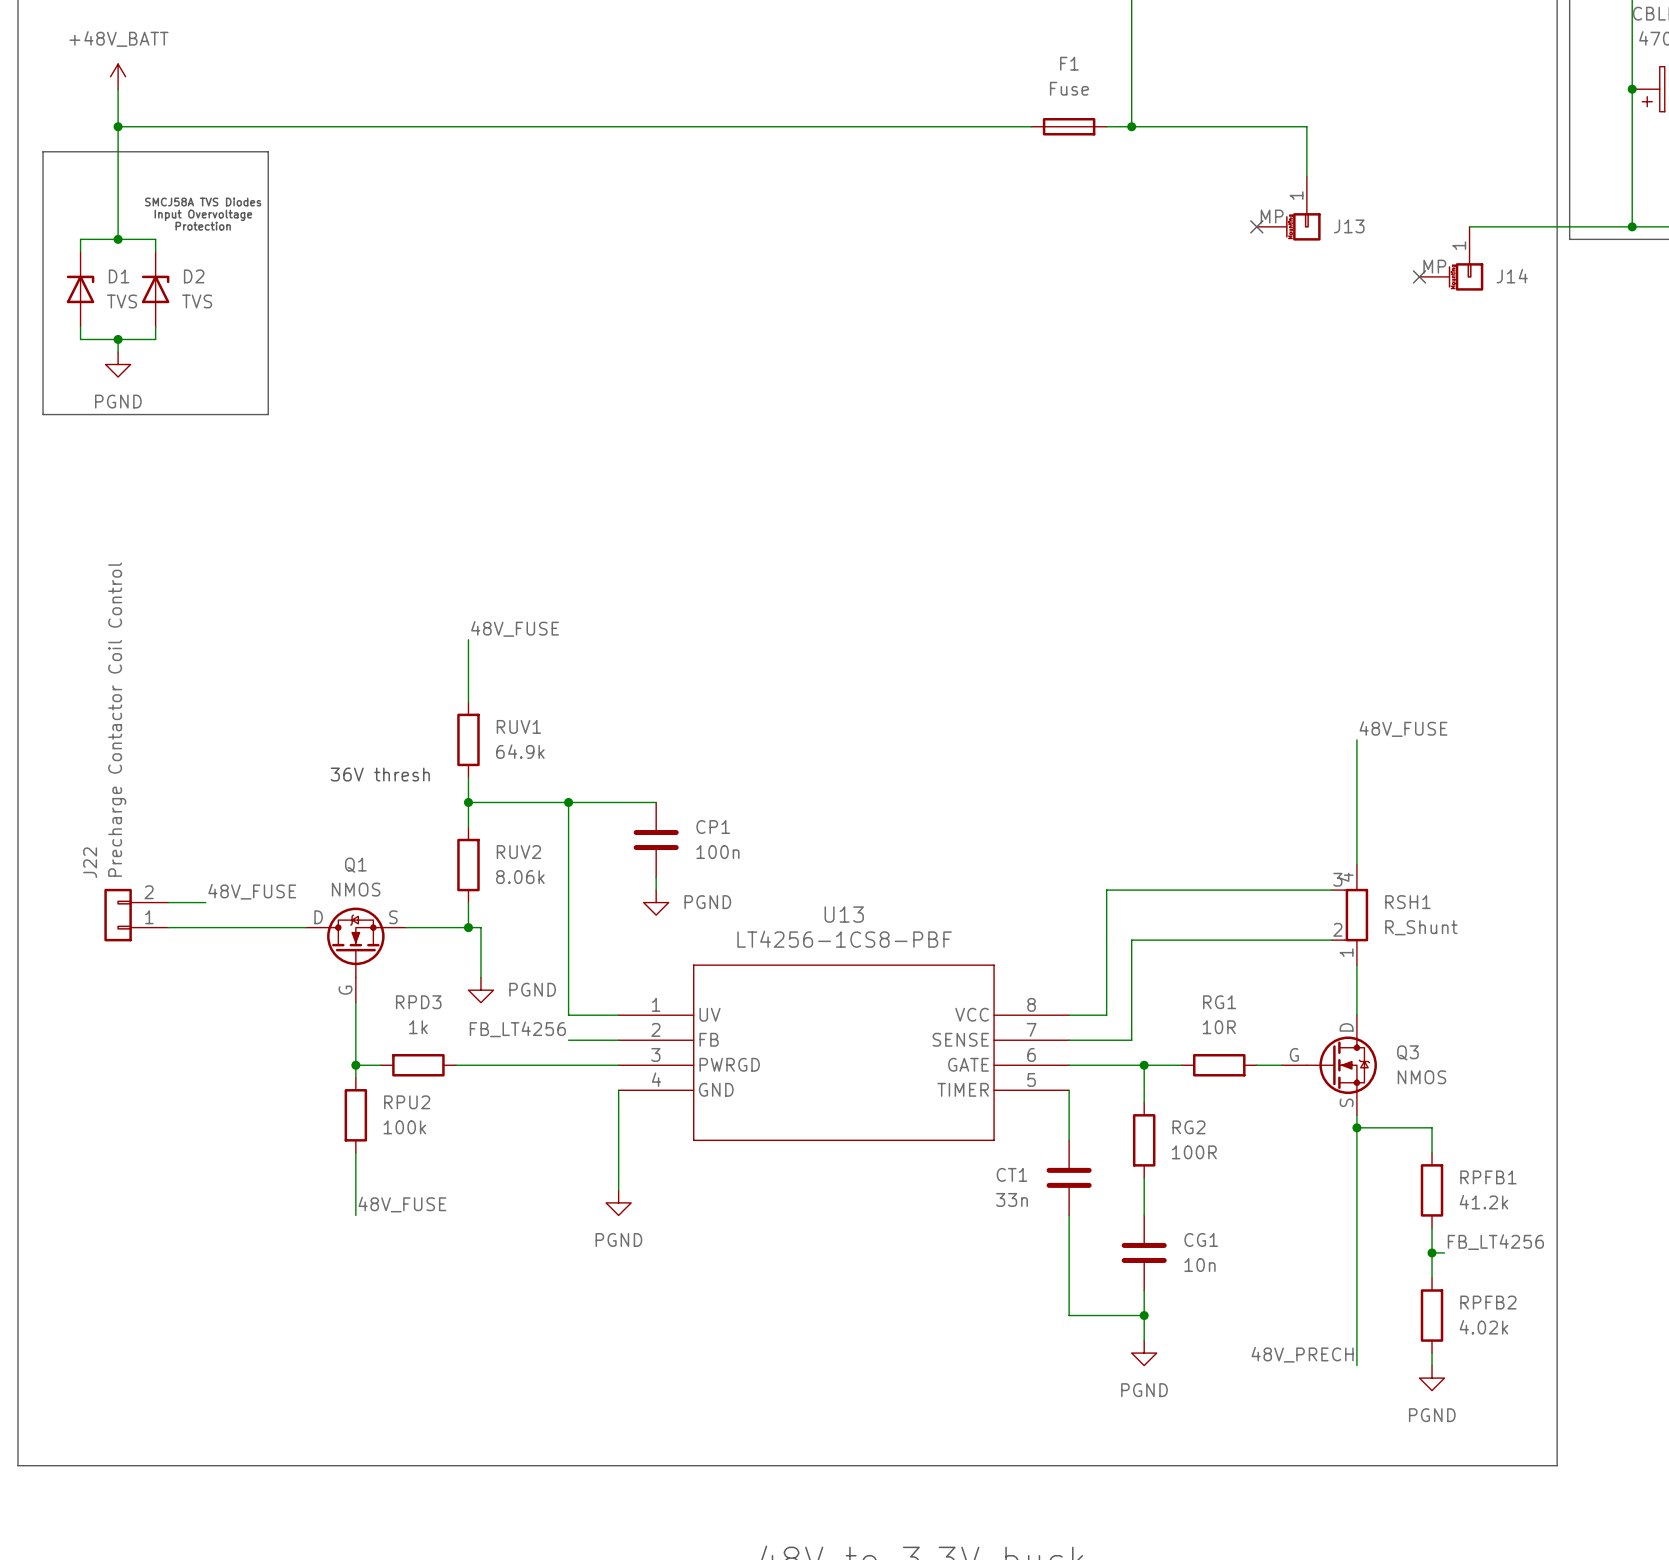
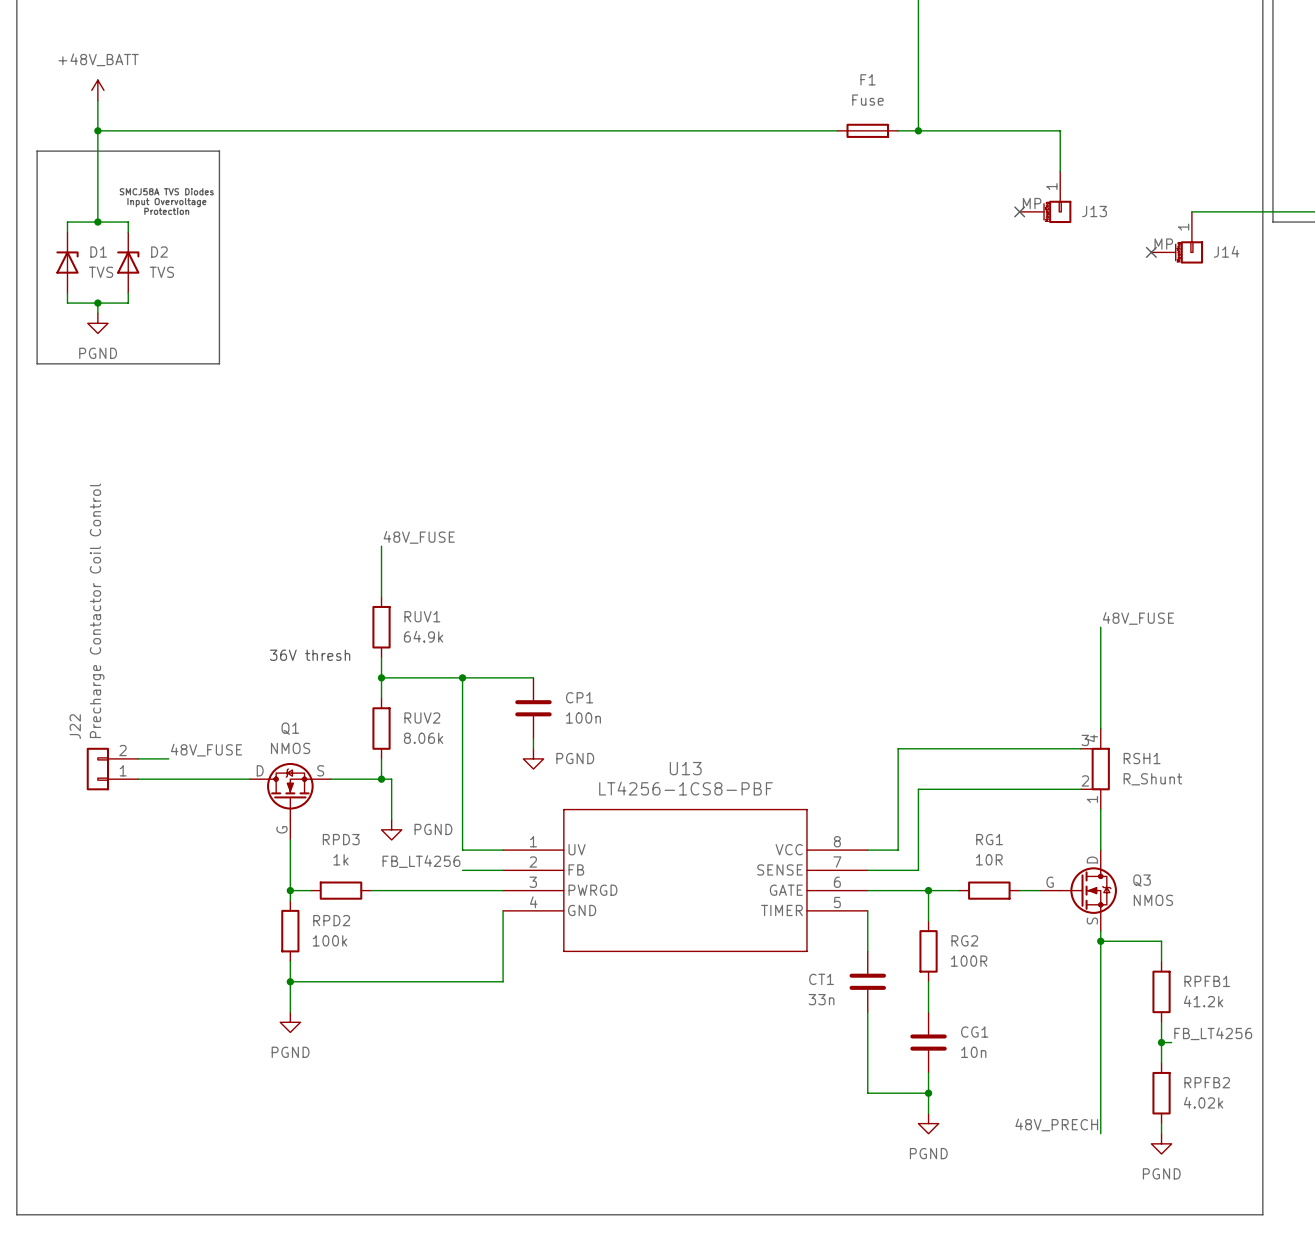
RPU2 name: RPU2 (407, 1102) -> RPD2 (331, 920)
junction: none -> (290, 981)
wire: (618, 1177) (618, 1190) -> (503, 981) (290, 981)
power symbol: PGND (618, 1202) -> none
label: 48V_FUSE (402, 1204) -> none
power symbol: none -> PGND (290, 1022)

